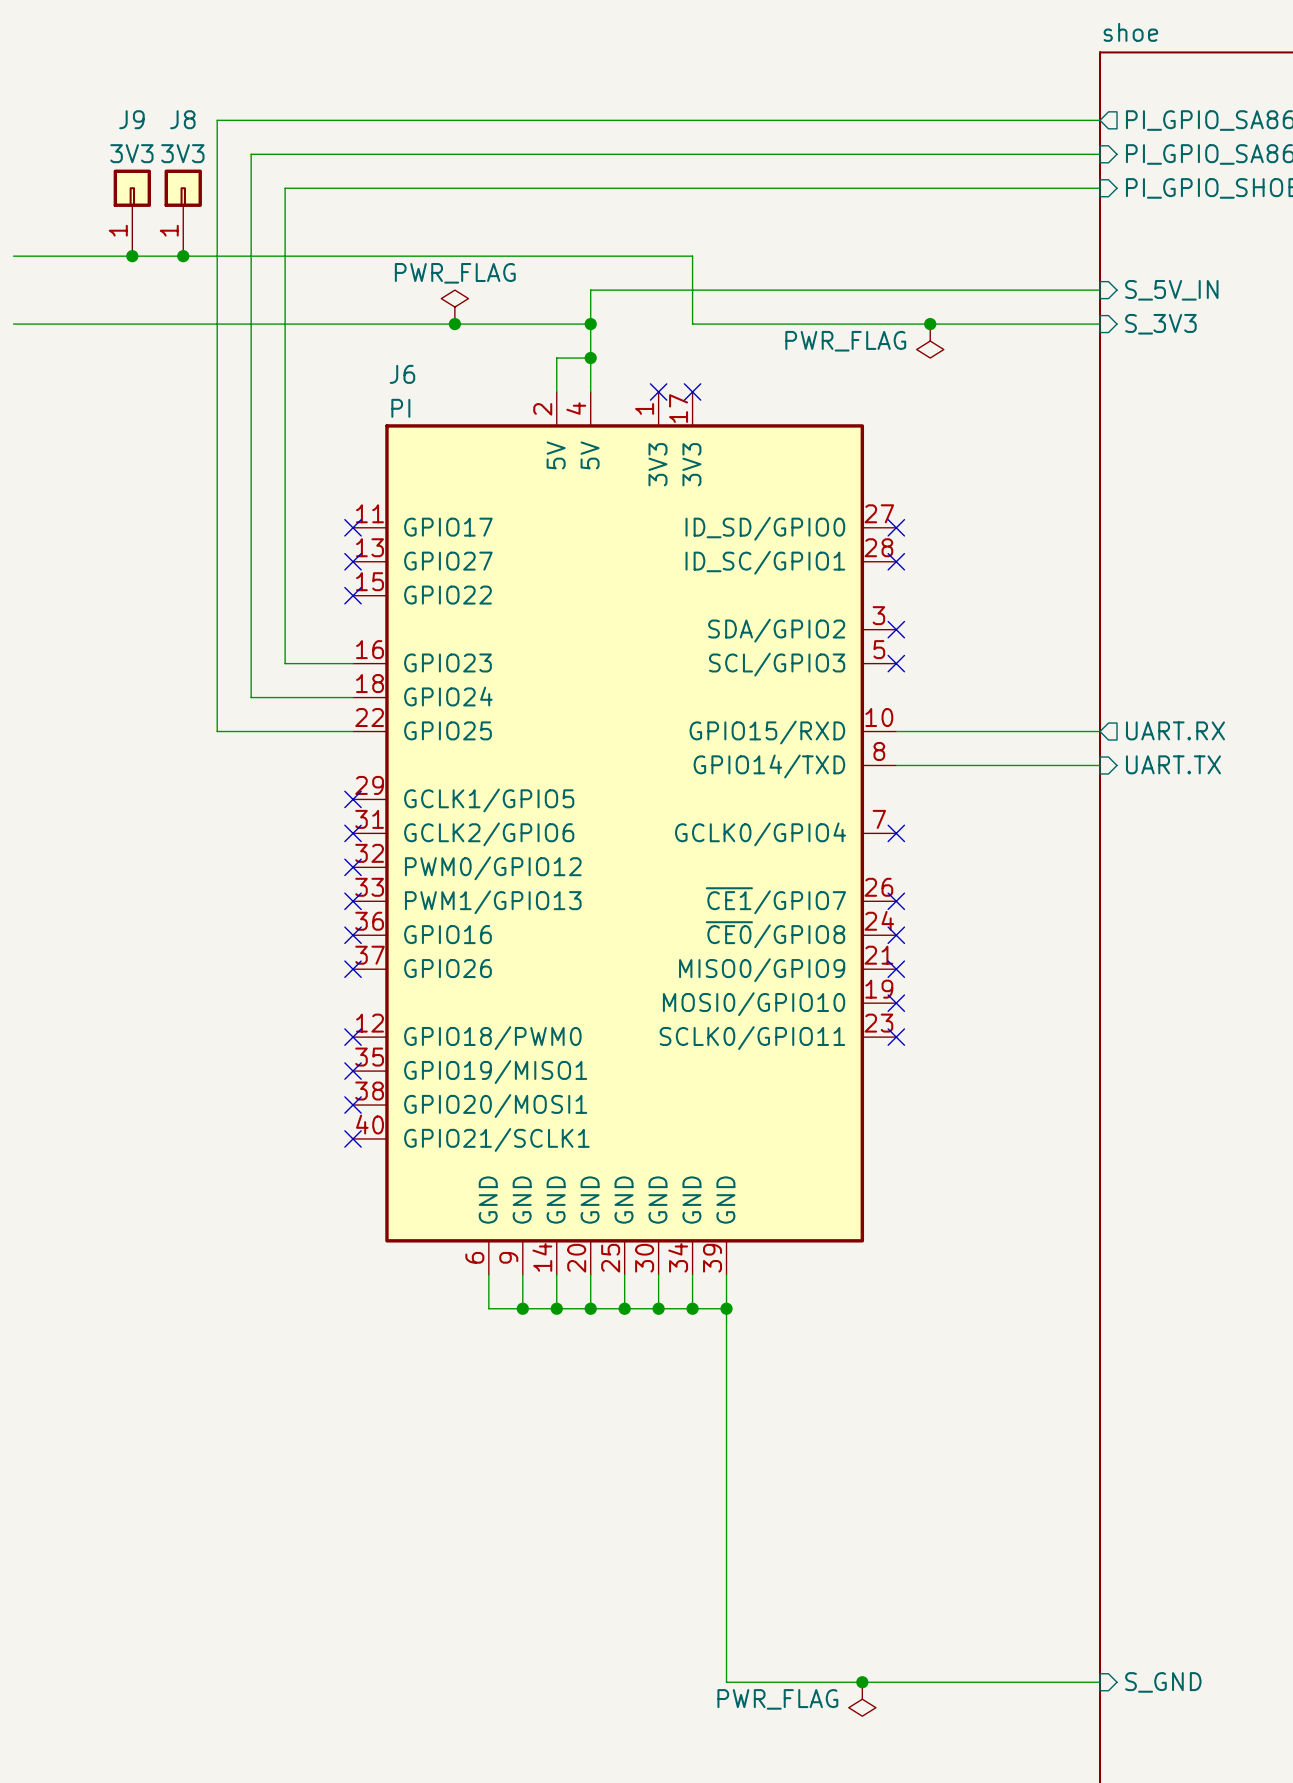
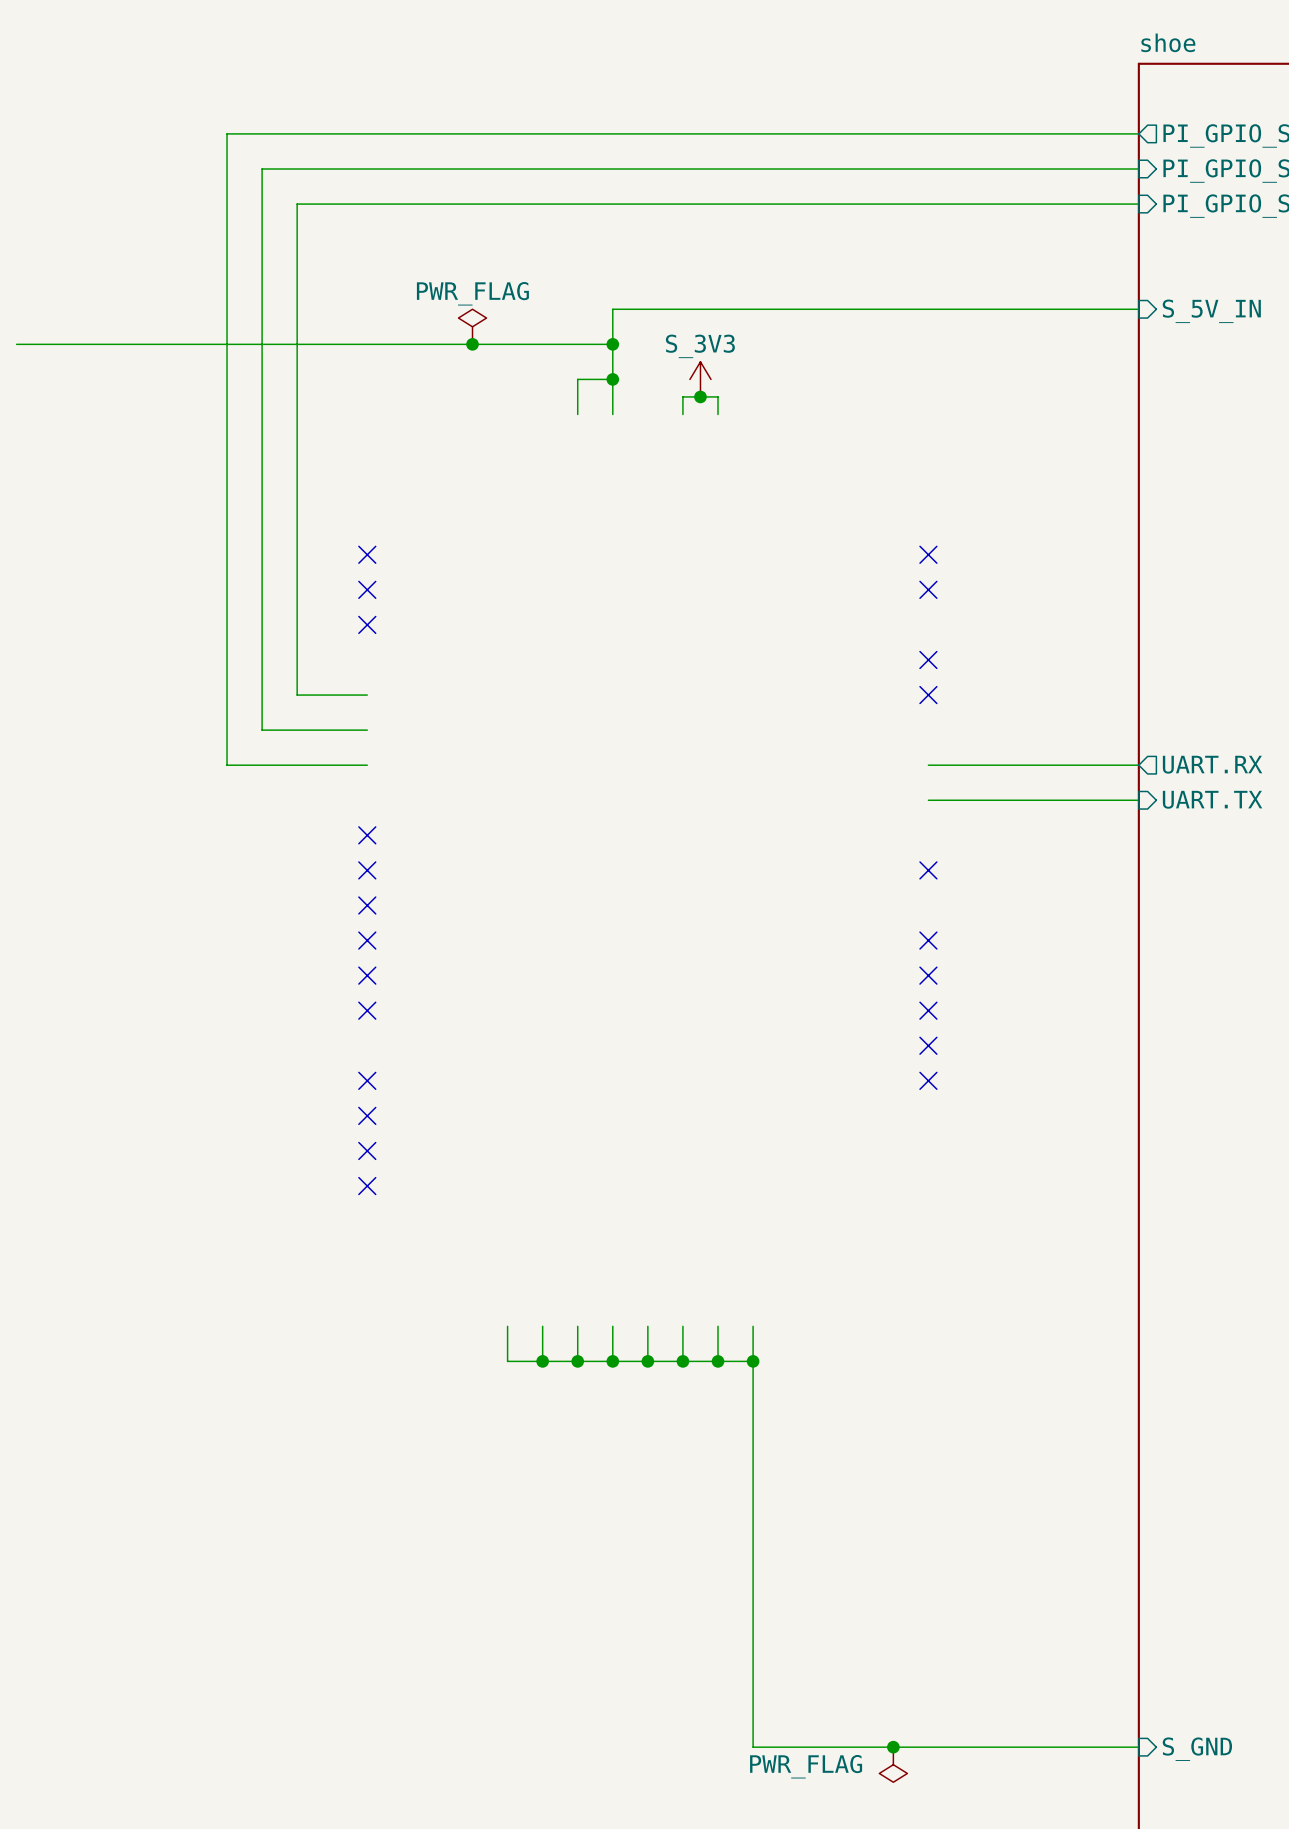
J9: 3V3 (132, 212) -> none
J8: 3V3 (183, 212) -> none
wire: (13, 256) (692, 256) (692, 324) (1100, 324) -> none
junction: (132, 256) -> none
junction: (183, 256) -> none
junction: (930, 324) -> none
sheet pin: S_3V3 (1160, 324) -> none
power symbol: PWR_FLAG (930, 341) -> none
power symbol: none -> S_3V3 (700, 379)
junction: none -> (700, 396)
wire: none -> (682, 414) (682, 396) (718, 396) (718, 414)
no-connect mark: (658, 391) -> none
no-connect mark: (692, 391) -> none
J6: PI (624, 833) -> none

